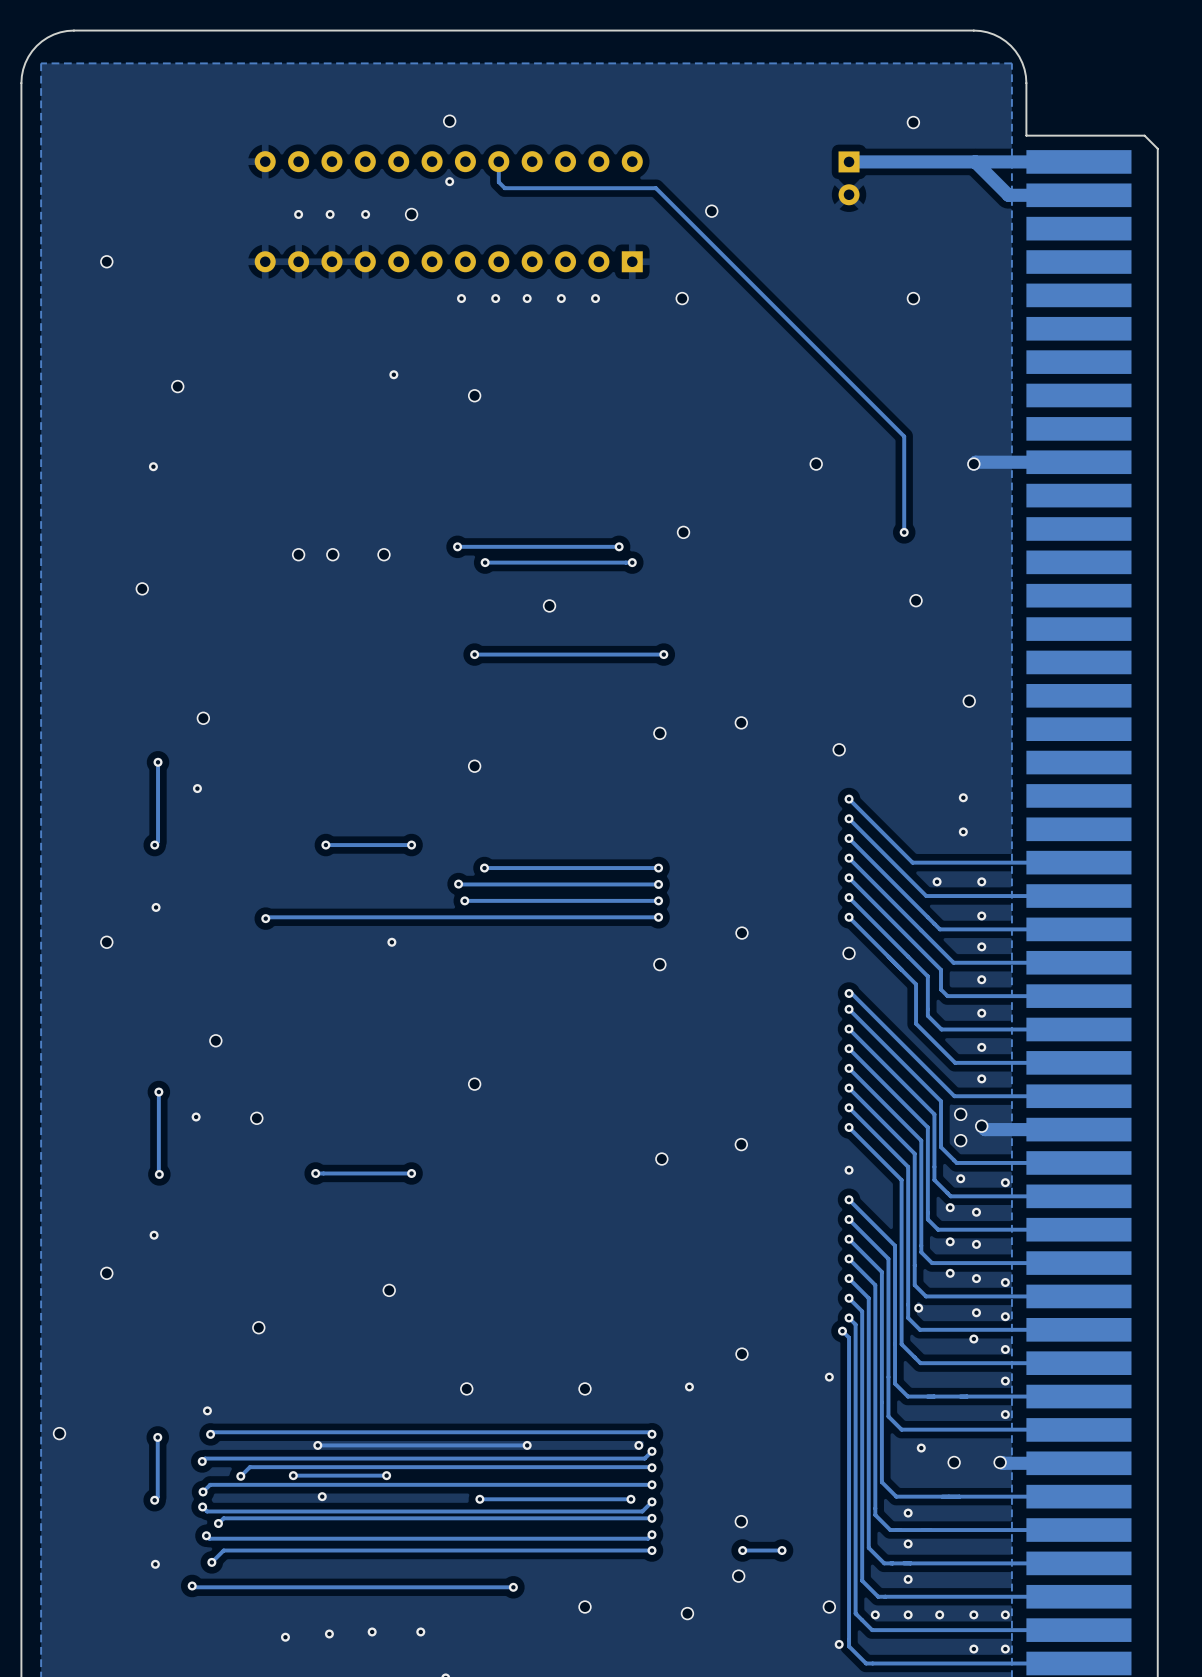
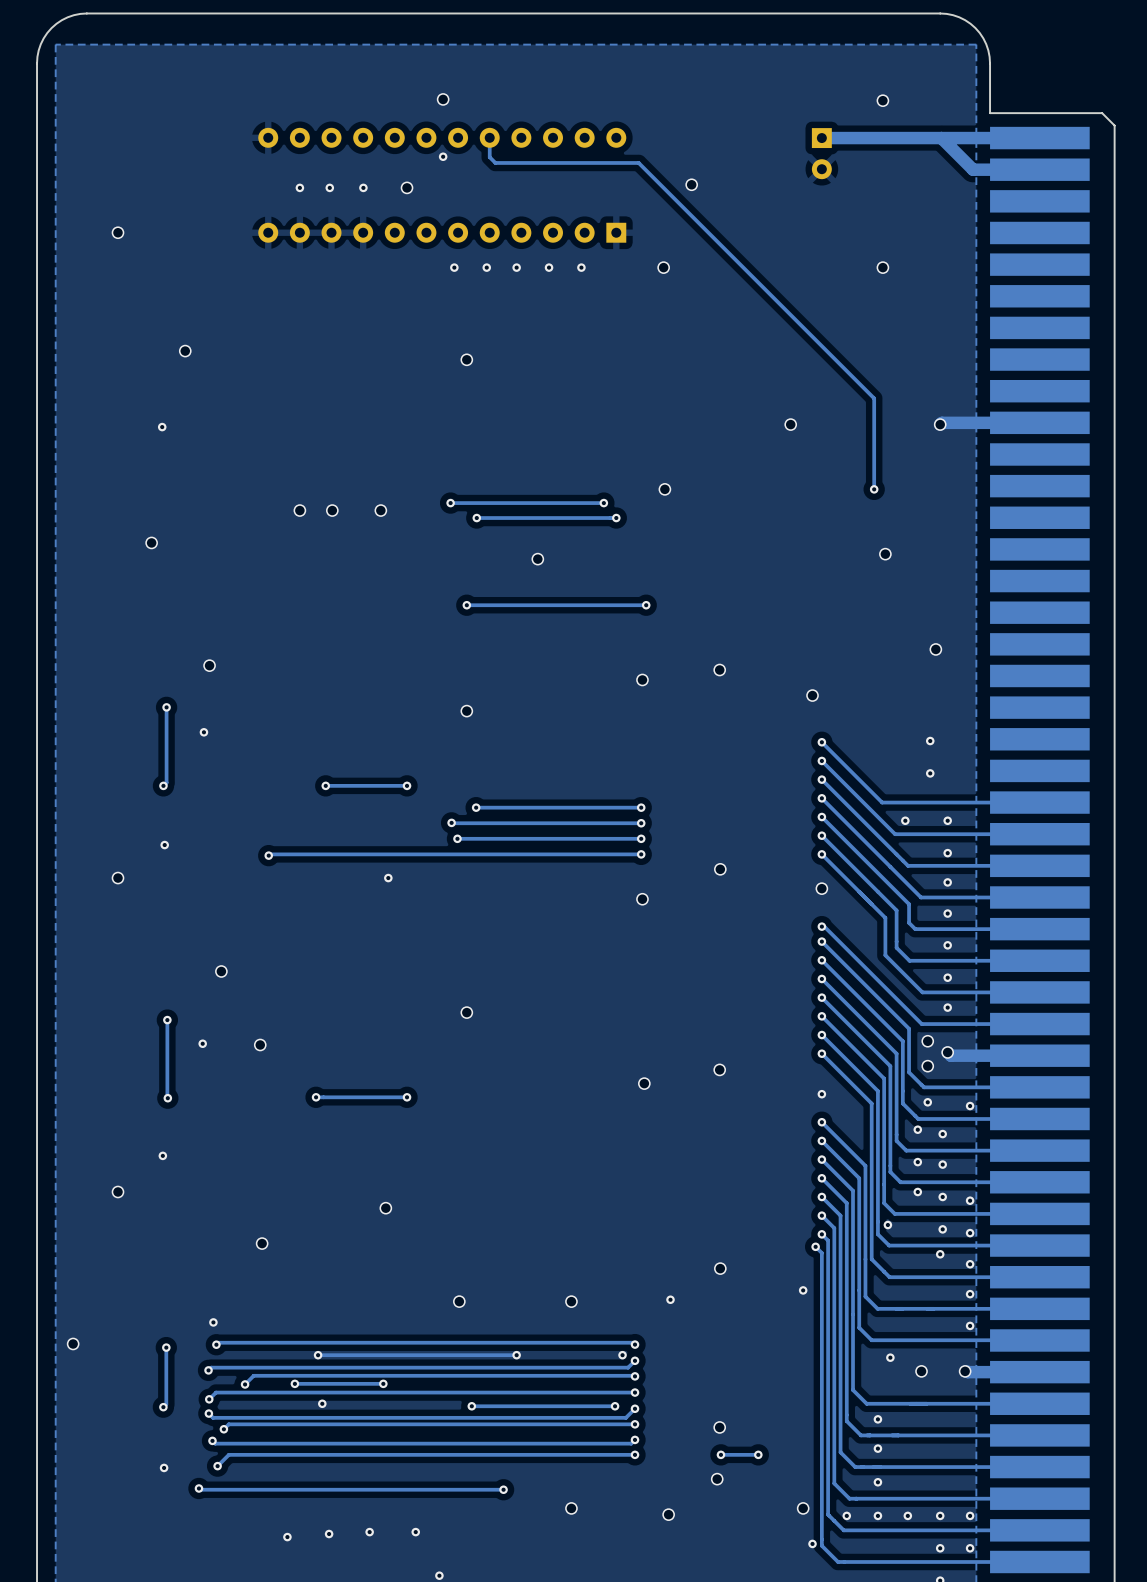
via: (393, 374) -> none

